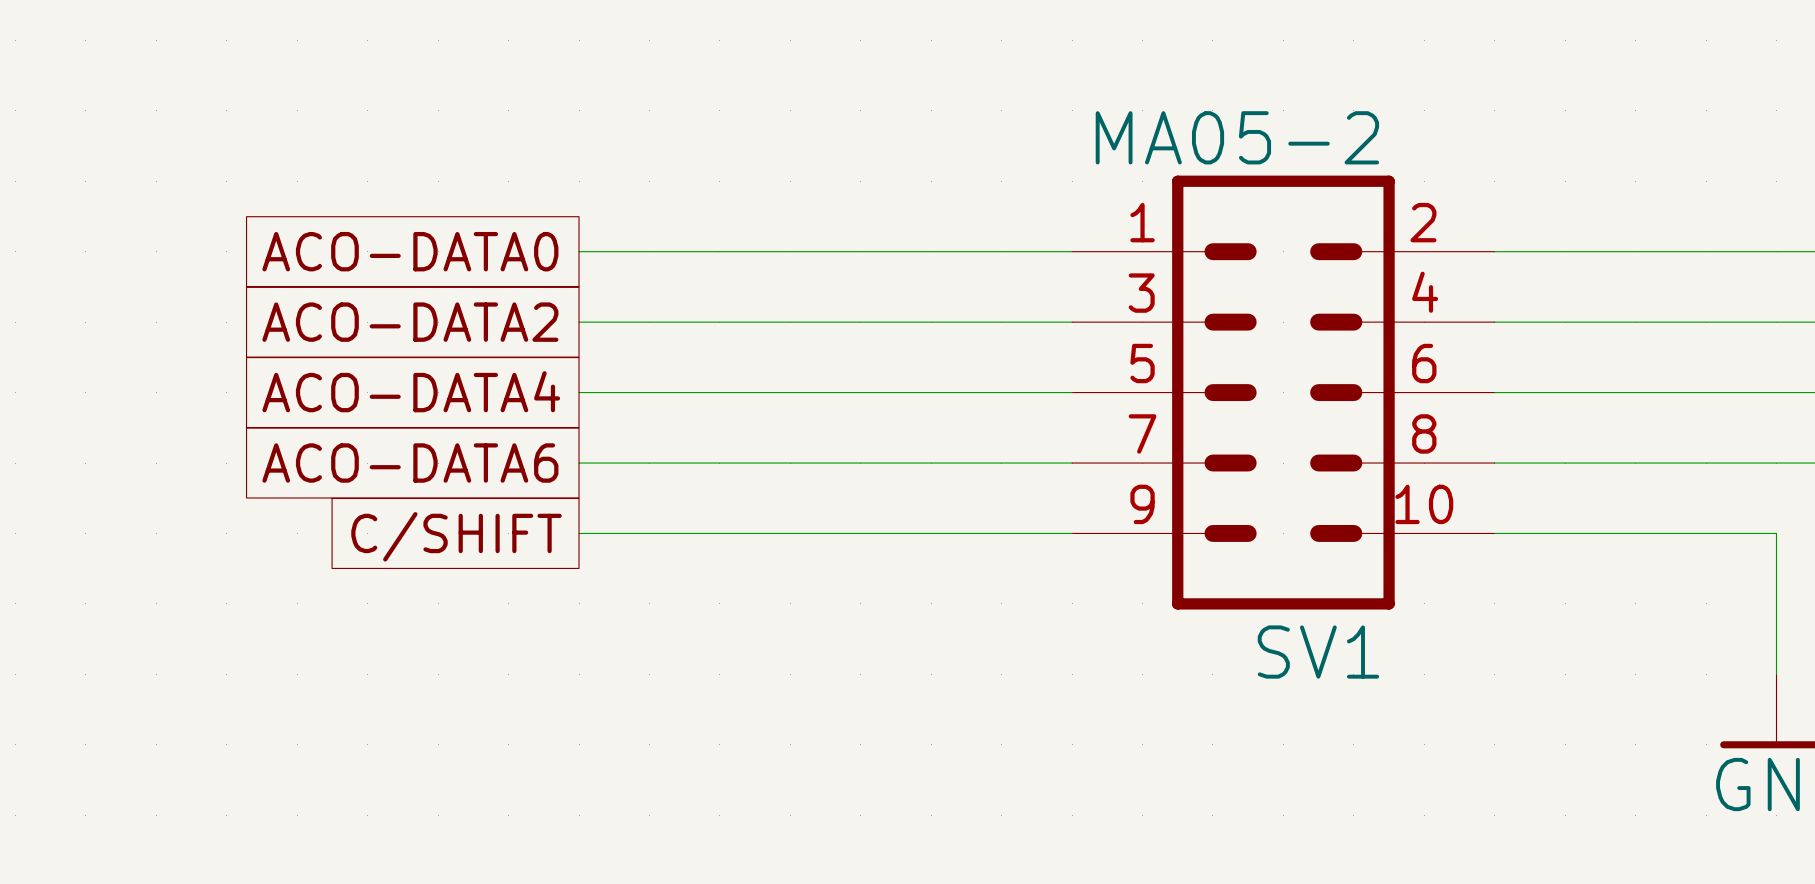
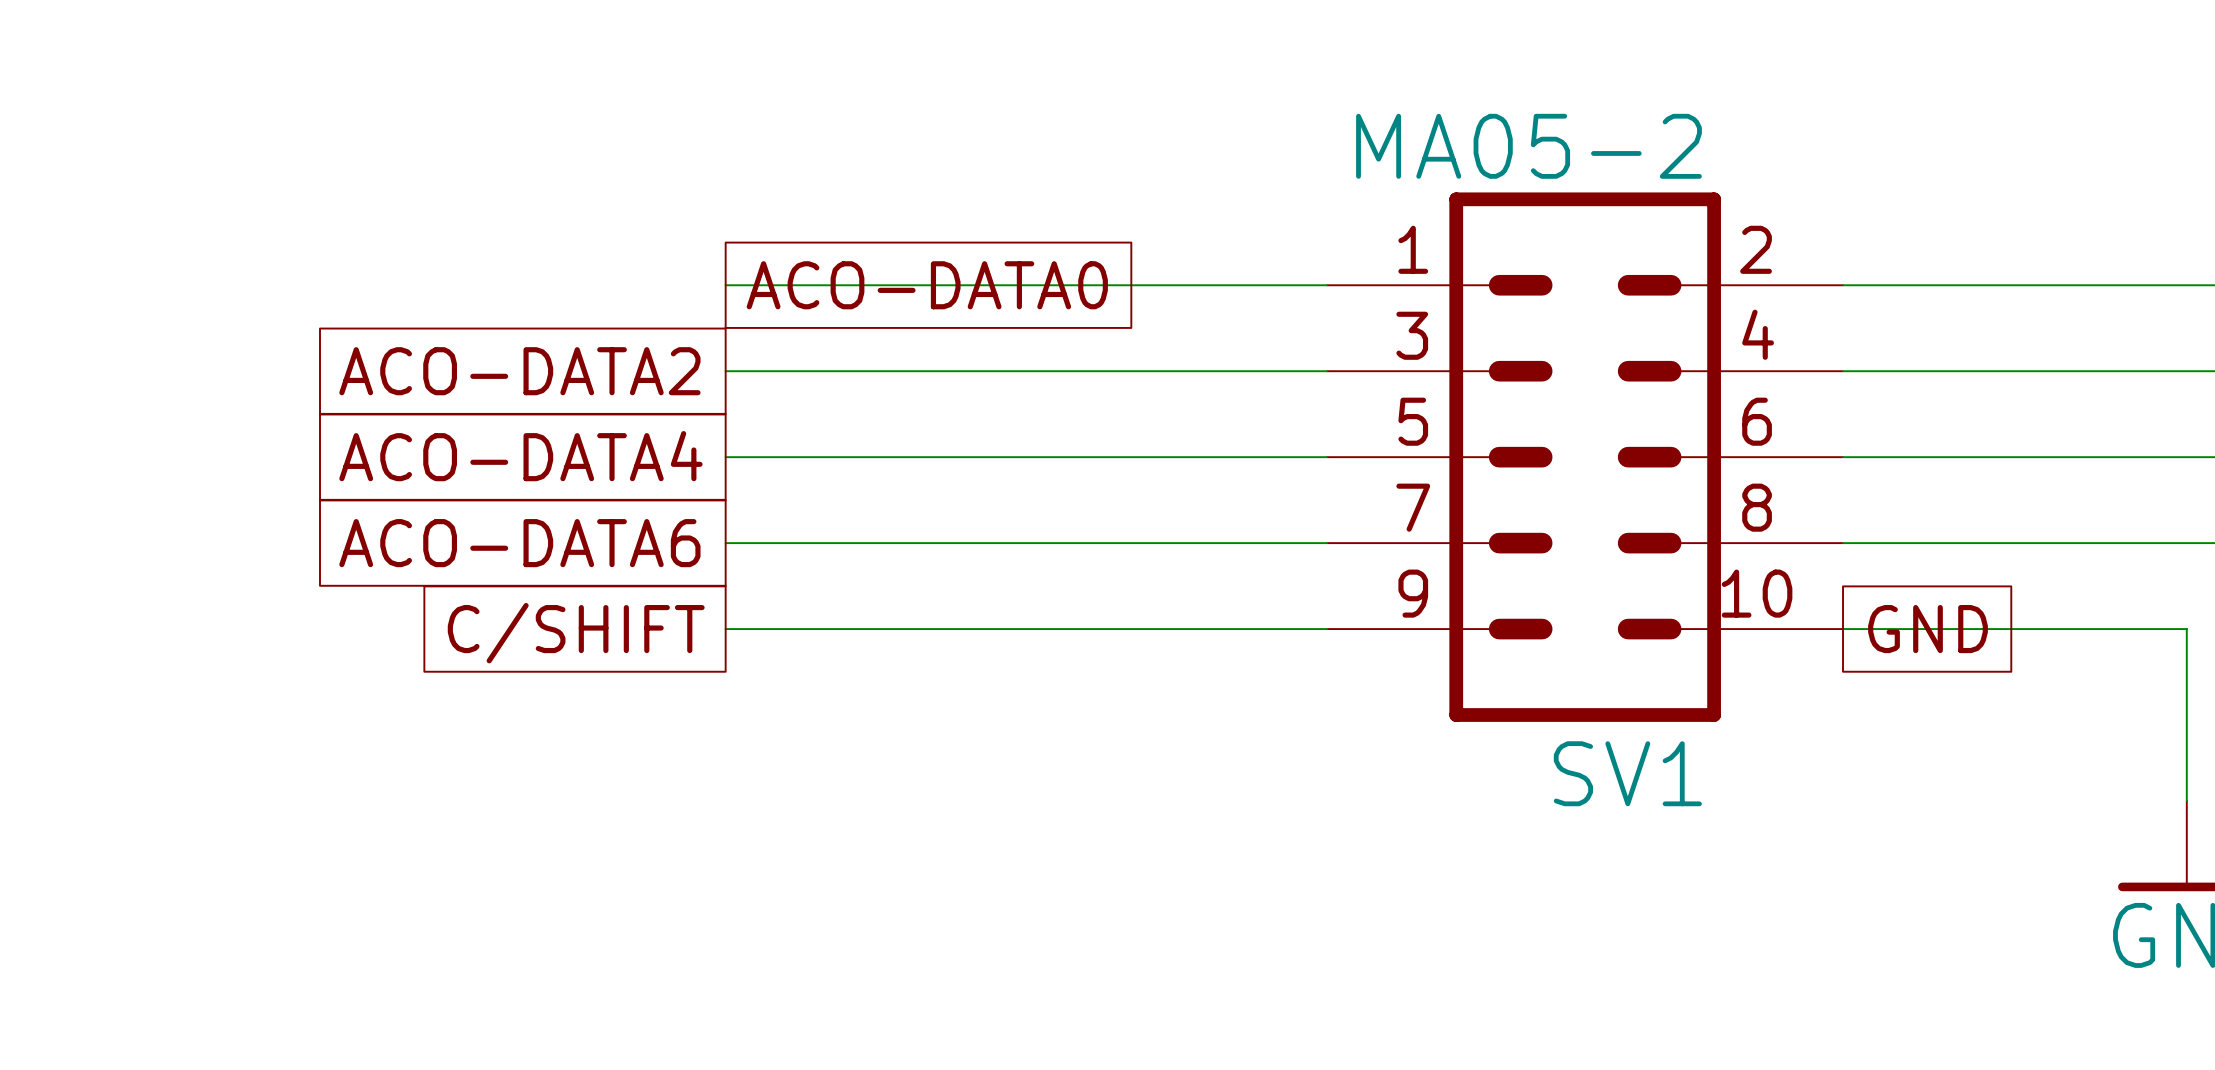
global label rotation: 0° (410, 251) -> 180° (927, 285)
global label position: ACO-DATA0 (410, 251) -> ACO-DATA0 (927, 285)
global label: none -> GND (1928, 629)

